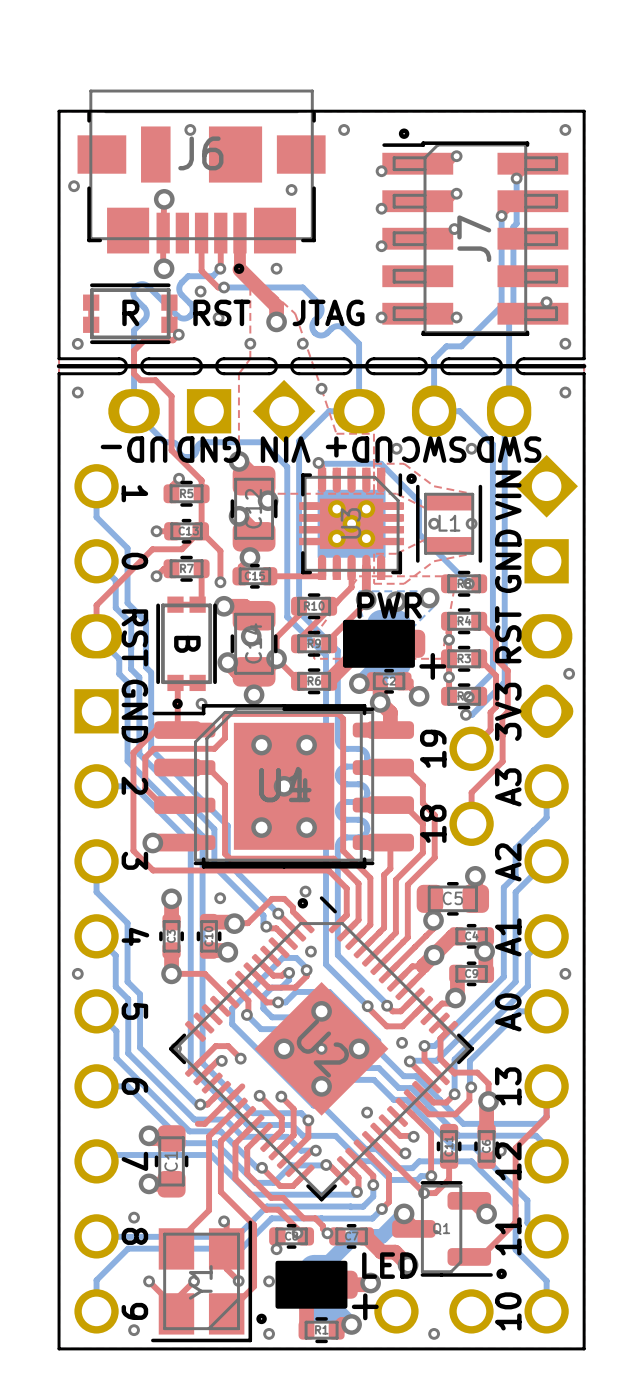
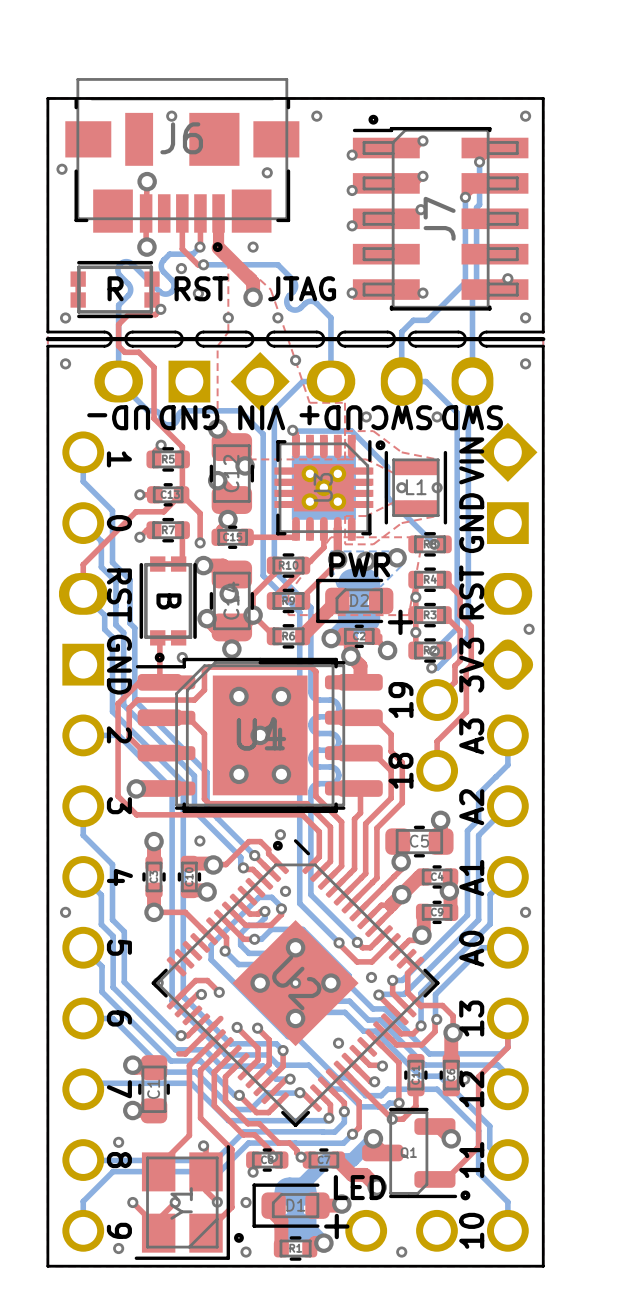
drawing: [343, 619, 415, 668] -> none
drawing: [275, 1260, 348, 1309] -> none

